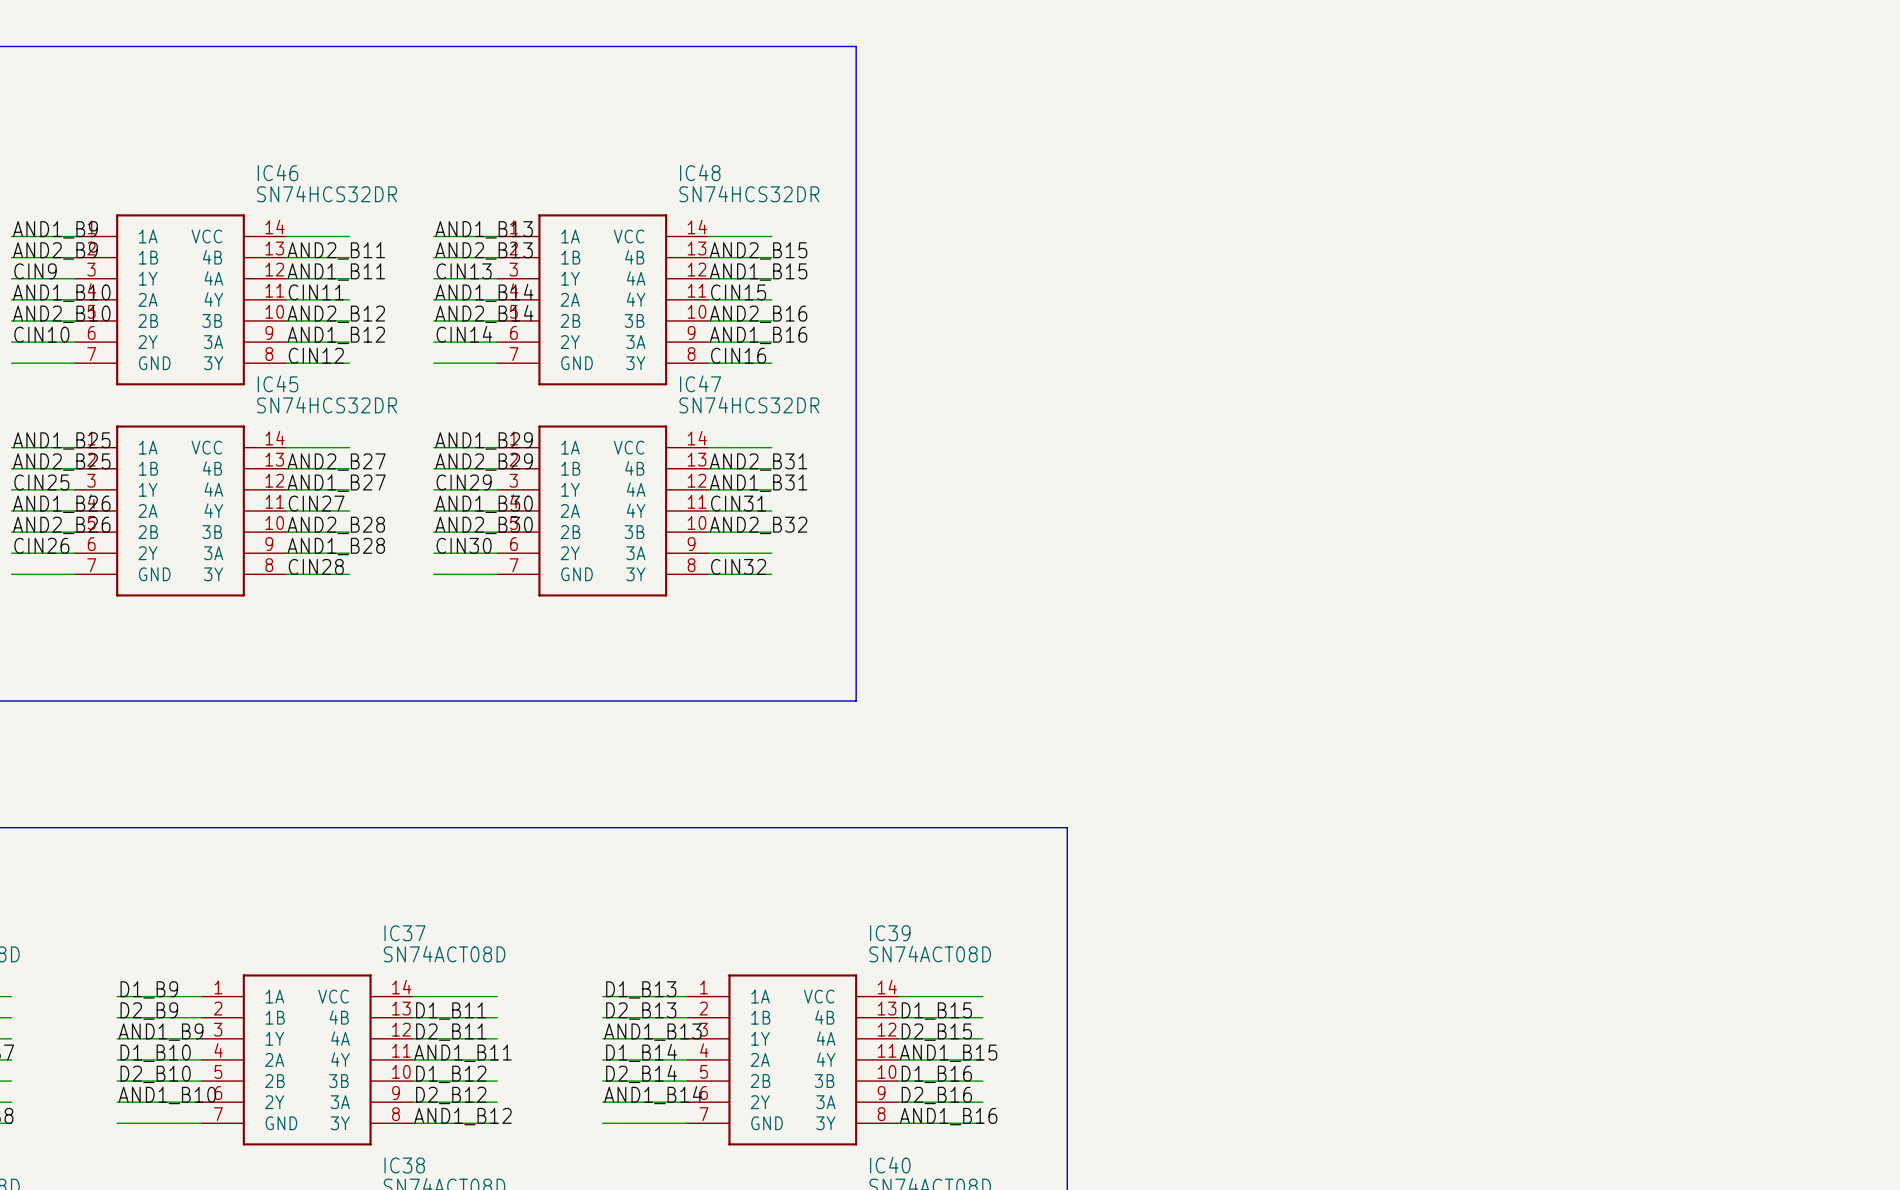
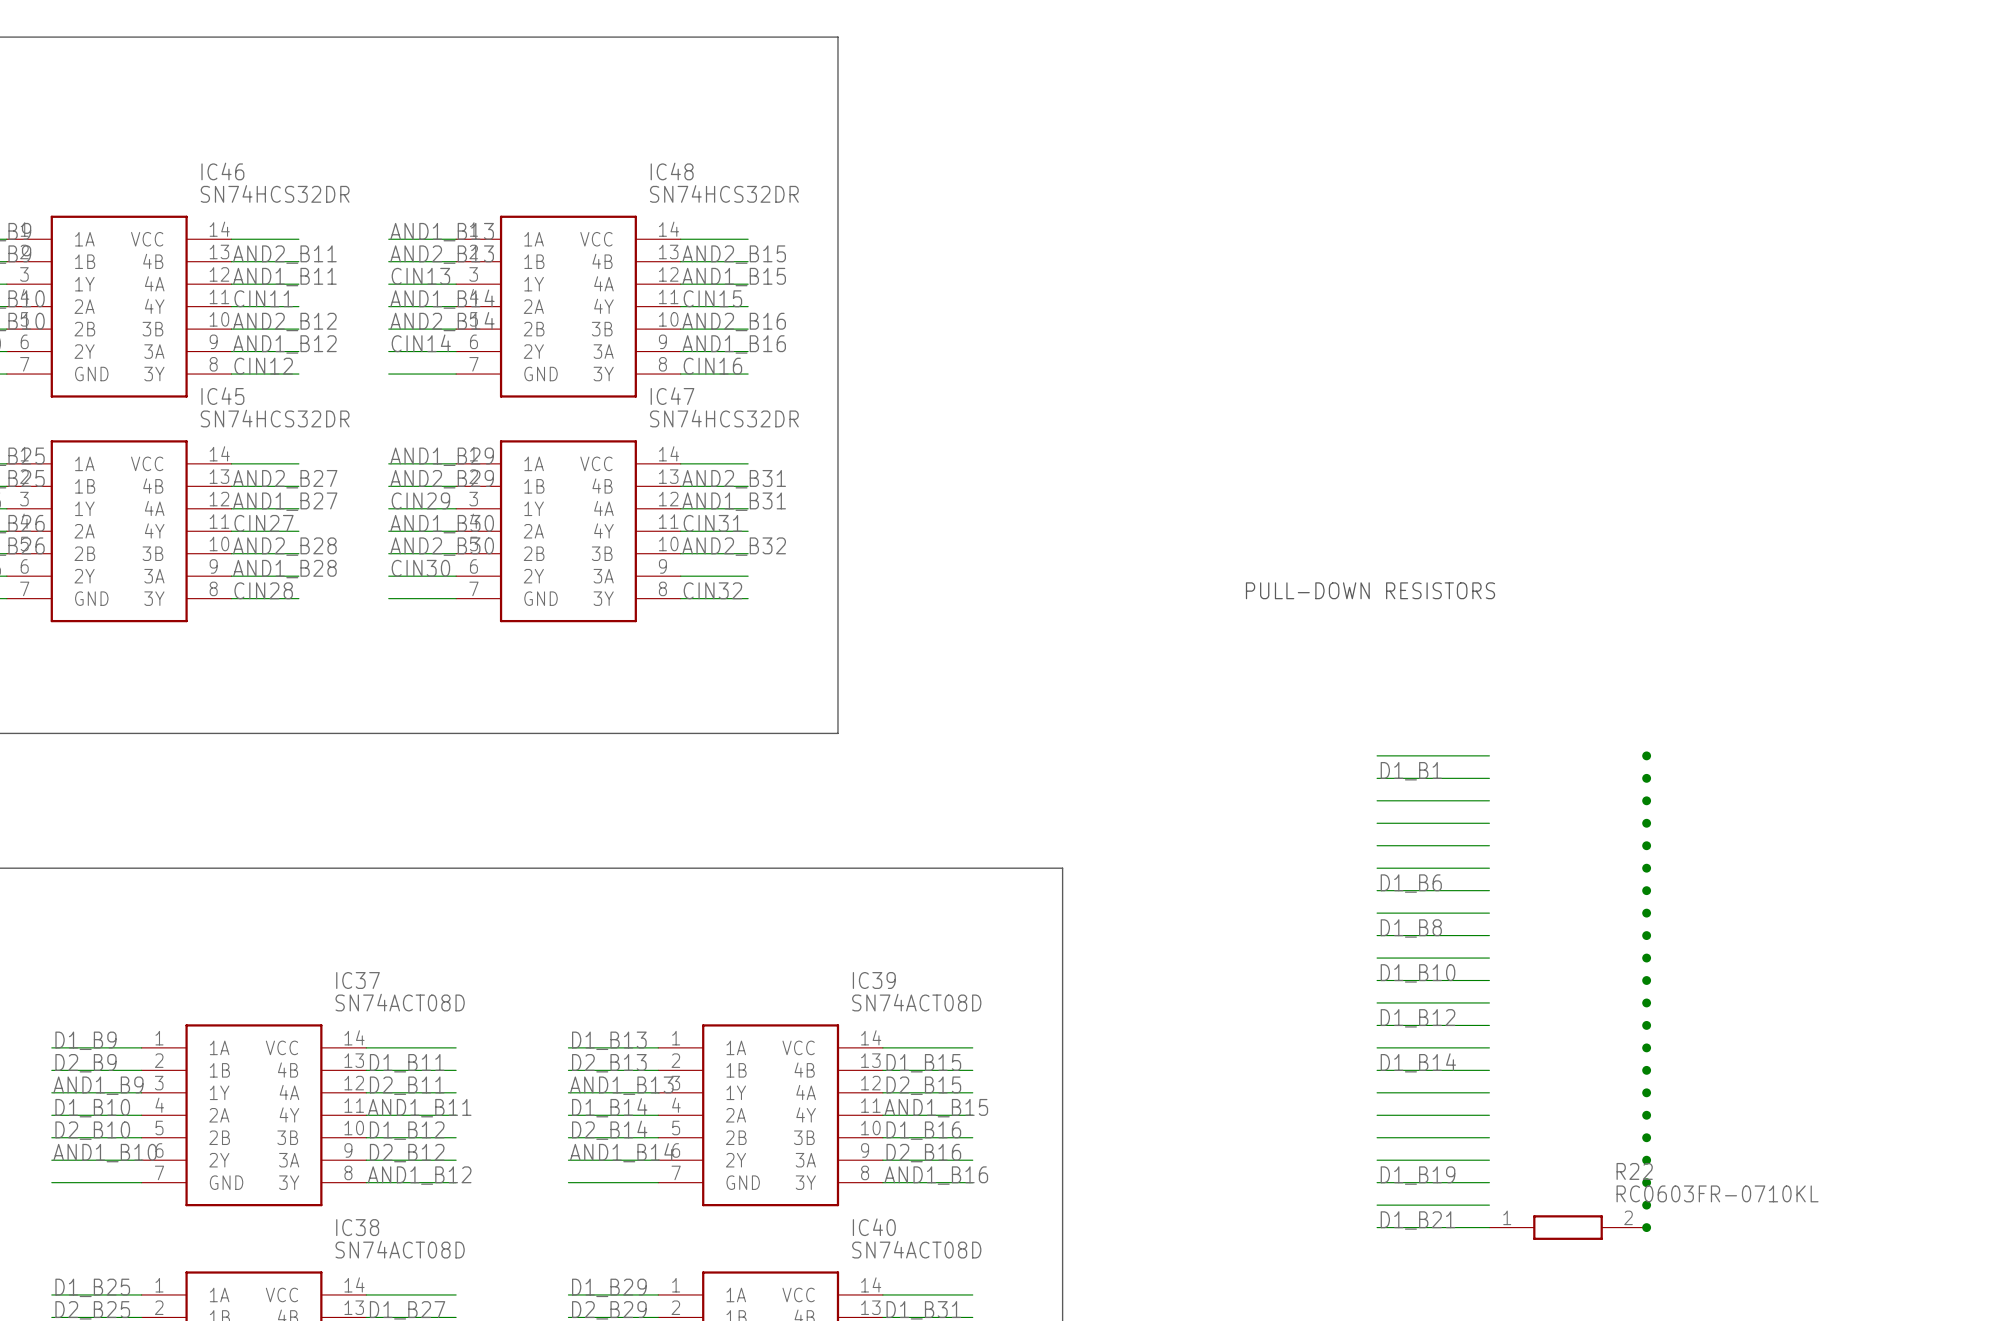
text: none -> PULL-DOWN RESISTORS (1370, 590)
wire: none -> (1377, 755) (1489, 755)
junction: none -> (1646, 755)
label: none -> D1_B1 (1411, 771)
wire: none -> (1377, 778) (1489, 778)
junction: none -> (1646, 778)
wire: none -> (1377, 800) (1489, 800)
junction: none -> (1646, 800)
wire: none -> (1377, 823) (1489, 823)
junction: none -> (1646, 823)
wire: none -> (1377, 845) (1489, 845)
junction: none -> (1646, 845)
wire: none -> (1377, 868) (1489, 868)
junction: none -> (1646, 868)
label: none -> D1_B6 (1411, 883)
wire: none -> (1377, 890) (1489, 890)
junction: none -> (1646, 890)
wire: none -> (1377, 913) (1489, 913)
junction: none -> (1646, 913)
label: none -> D1_B8 (1411, 928)
wire: none -> (1377, 935) (1489, 935)
junction: none -> (1646, 935)
wire: none -> (1377, 958) (1489, 958)
junction: none -> (1646, 958)
label: none -> D1_B10 (1418, 973)
wire: none -> (1377, 980) (1489, 980)
junction: none -> (1646, 980)
wire: none -> (1377, 1002) (1489, 1002)
junction: none -> (1646, 1002)
label: none -> D1_B12 (1418, 1018)
wire: none -> (1377, 1025) (1489, 1025)
junction: none -> (1646, 1025)
wire: none -> (1377, 1047) (1489, 1047)
junction: none -> (1646, 1047)
label: none -> D1_B14 (1418, 1062)
wire: none -> (1377, 1070) (1489, 1070)
junction: none -> (1646, 1070)
wire: none -> (1377, 1092) (1489, 1092)
junction: none -> (1646, 1092)
wire: none -> (1377, 1115) (1489, 1115)
junction: none -> (1646, 1115)
wire: none -> (1377, 1137) (1489, 1137)
junction: none -> (1646, 1137)
wire: none -> (1377, 1160) (1489, 1160)
junction: none -> (1646, 1160)
label: none -> D1_B19 (1418, 1175)
wire: none -> (1377, 1182) (1489, 1182)
junction: none -> (1646, 1182)
wire: none -> (1377, 1205) (1489, 1205)
junction: none -> (1646, 1205)
label: none -> D1_B21 (1418, 1220)
wire: none -> (1377, 1227) (1489, 1227)
R22: none -> RC0603FR-0710KL (1568, 1227)
junction: none -> (1646, 1227)

